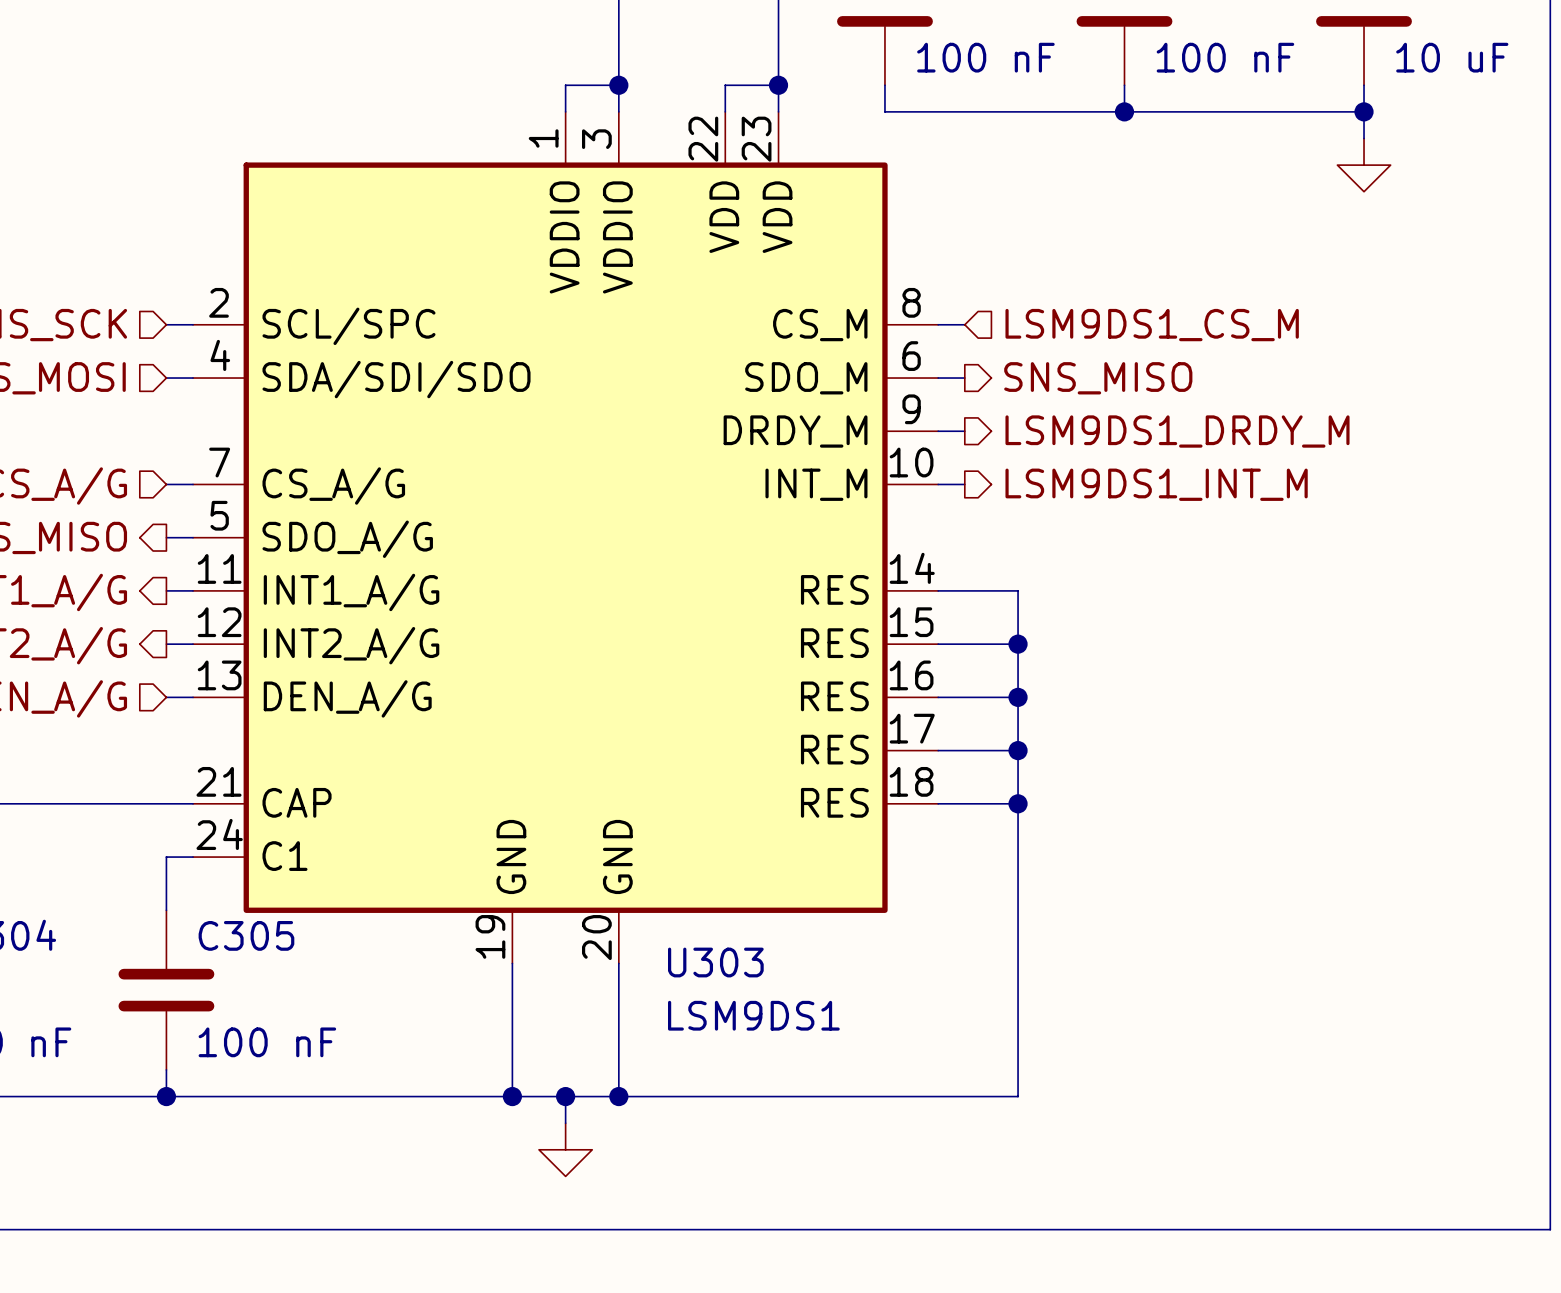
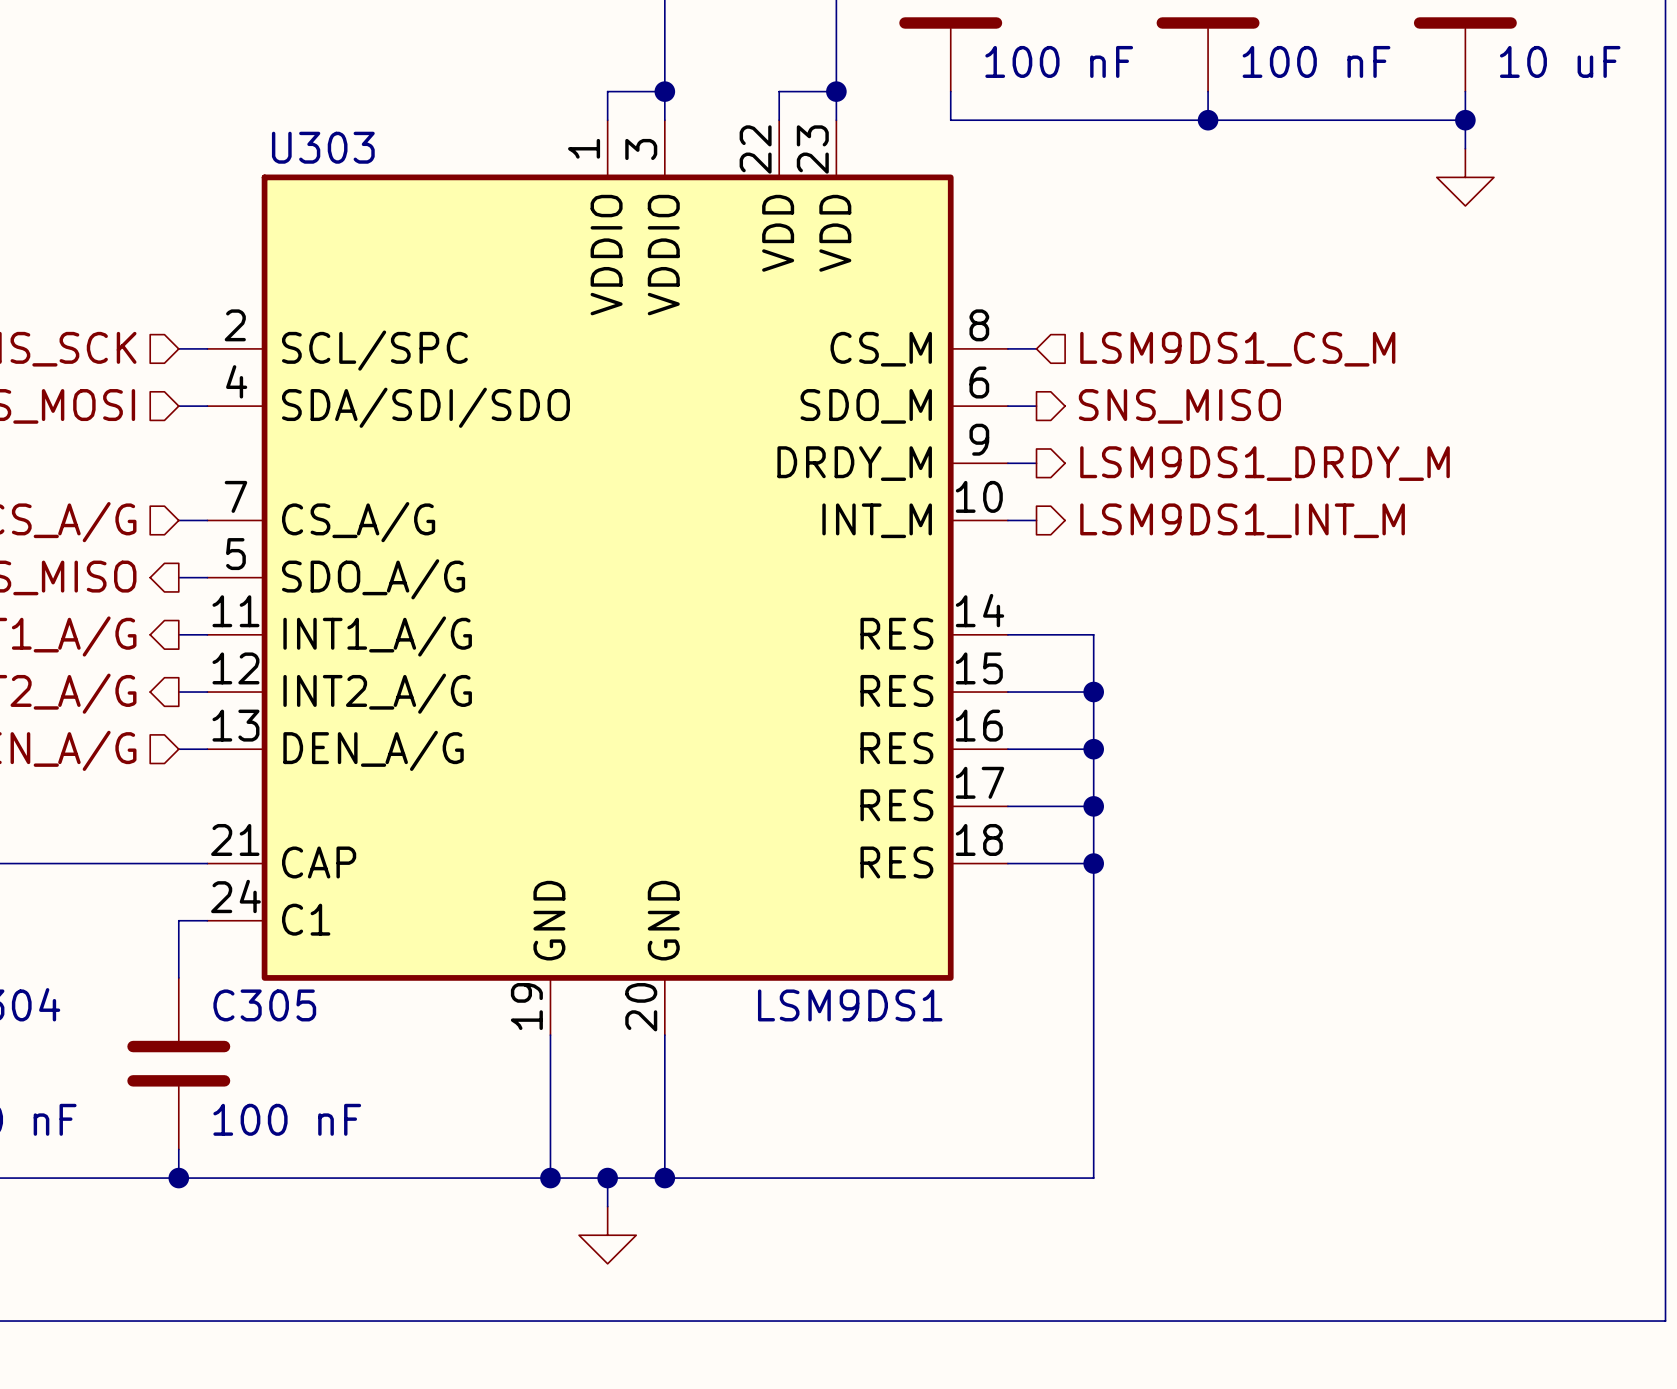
U303 name position: U303 (715, 962) -> U303 (323, 147)
U303 value position: LSM9DS1 (753, 1015) -> LSM9DS1 (850, 1005)

